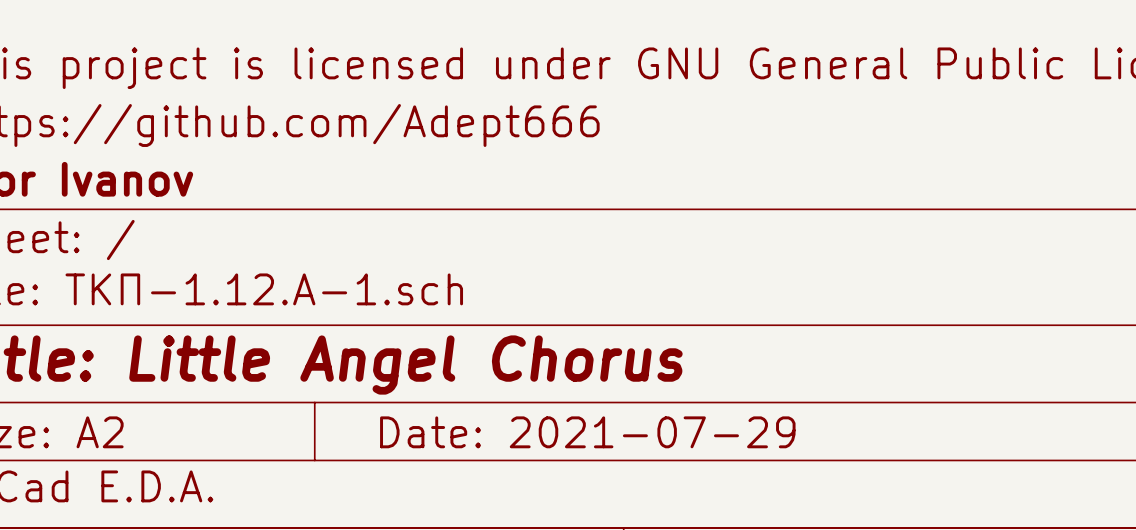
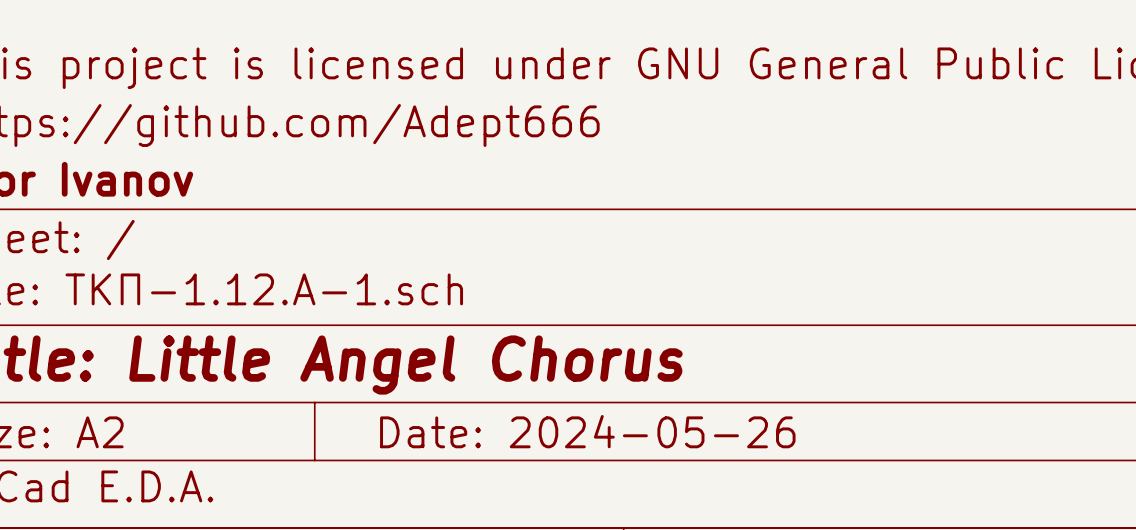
title block: Date: 2021-07-29 (587, 432) -> Date: 2024-05-26 (587, 431)

